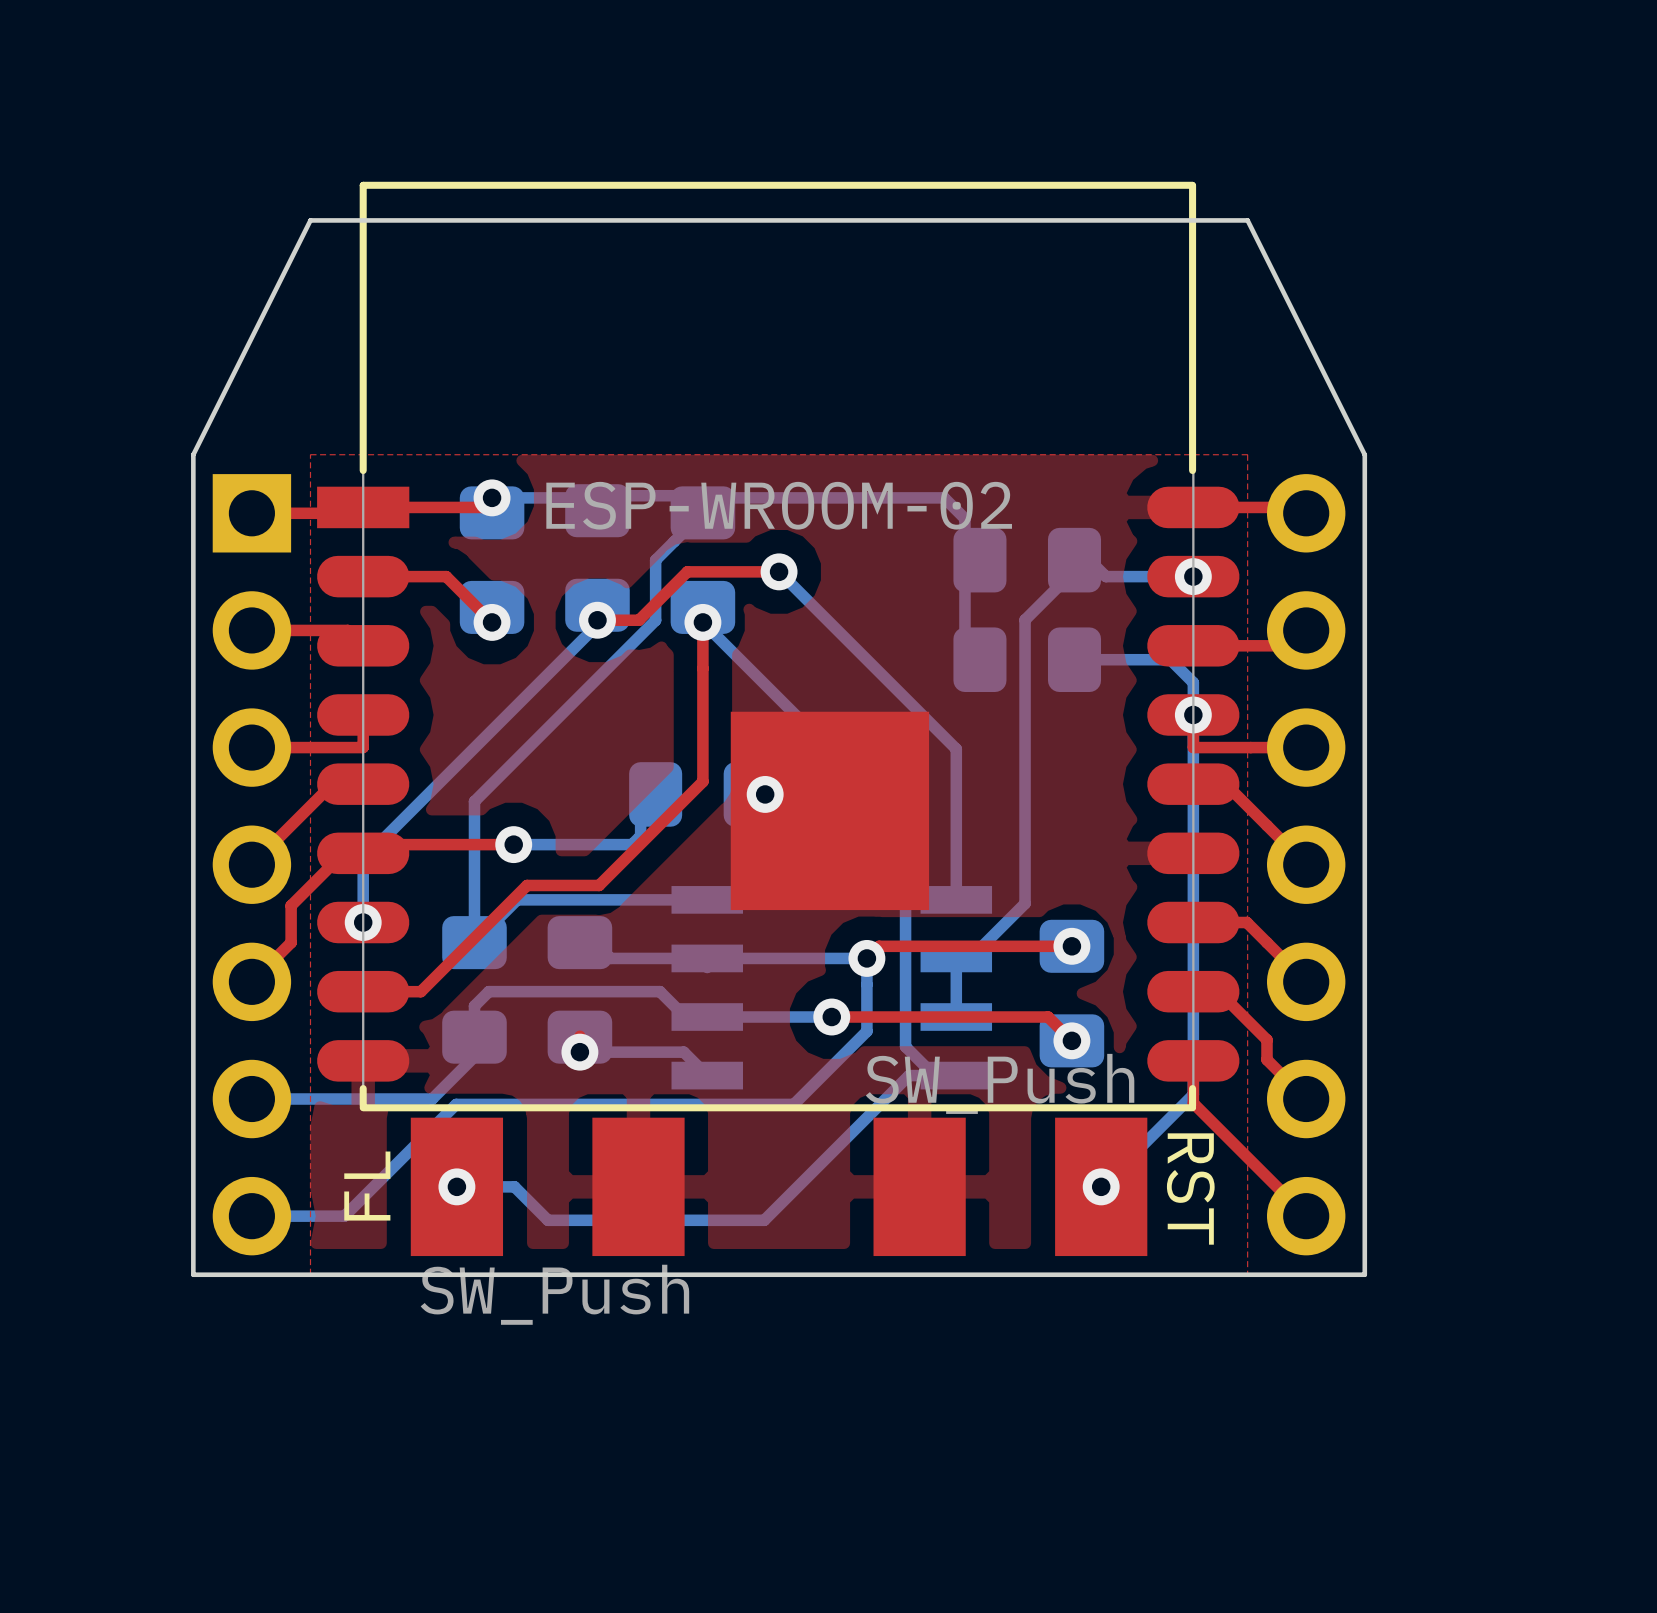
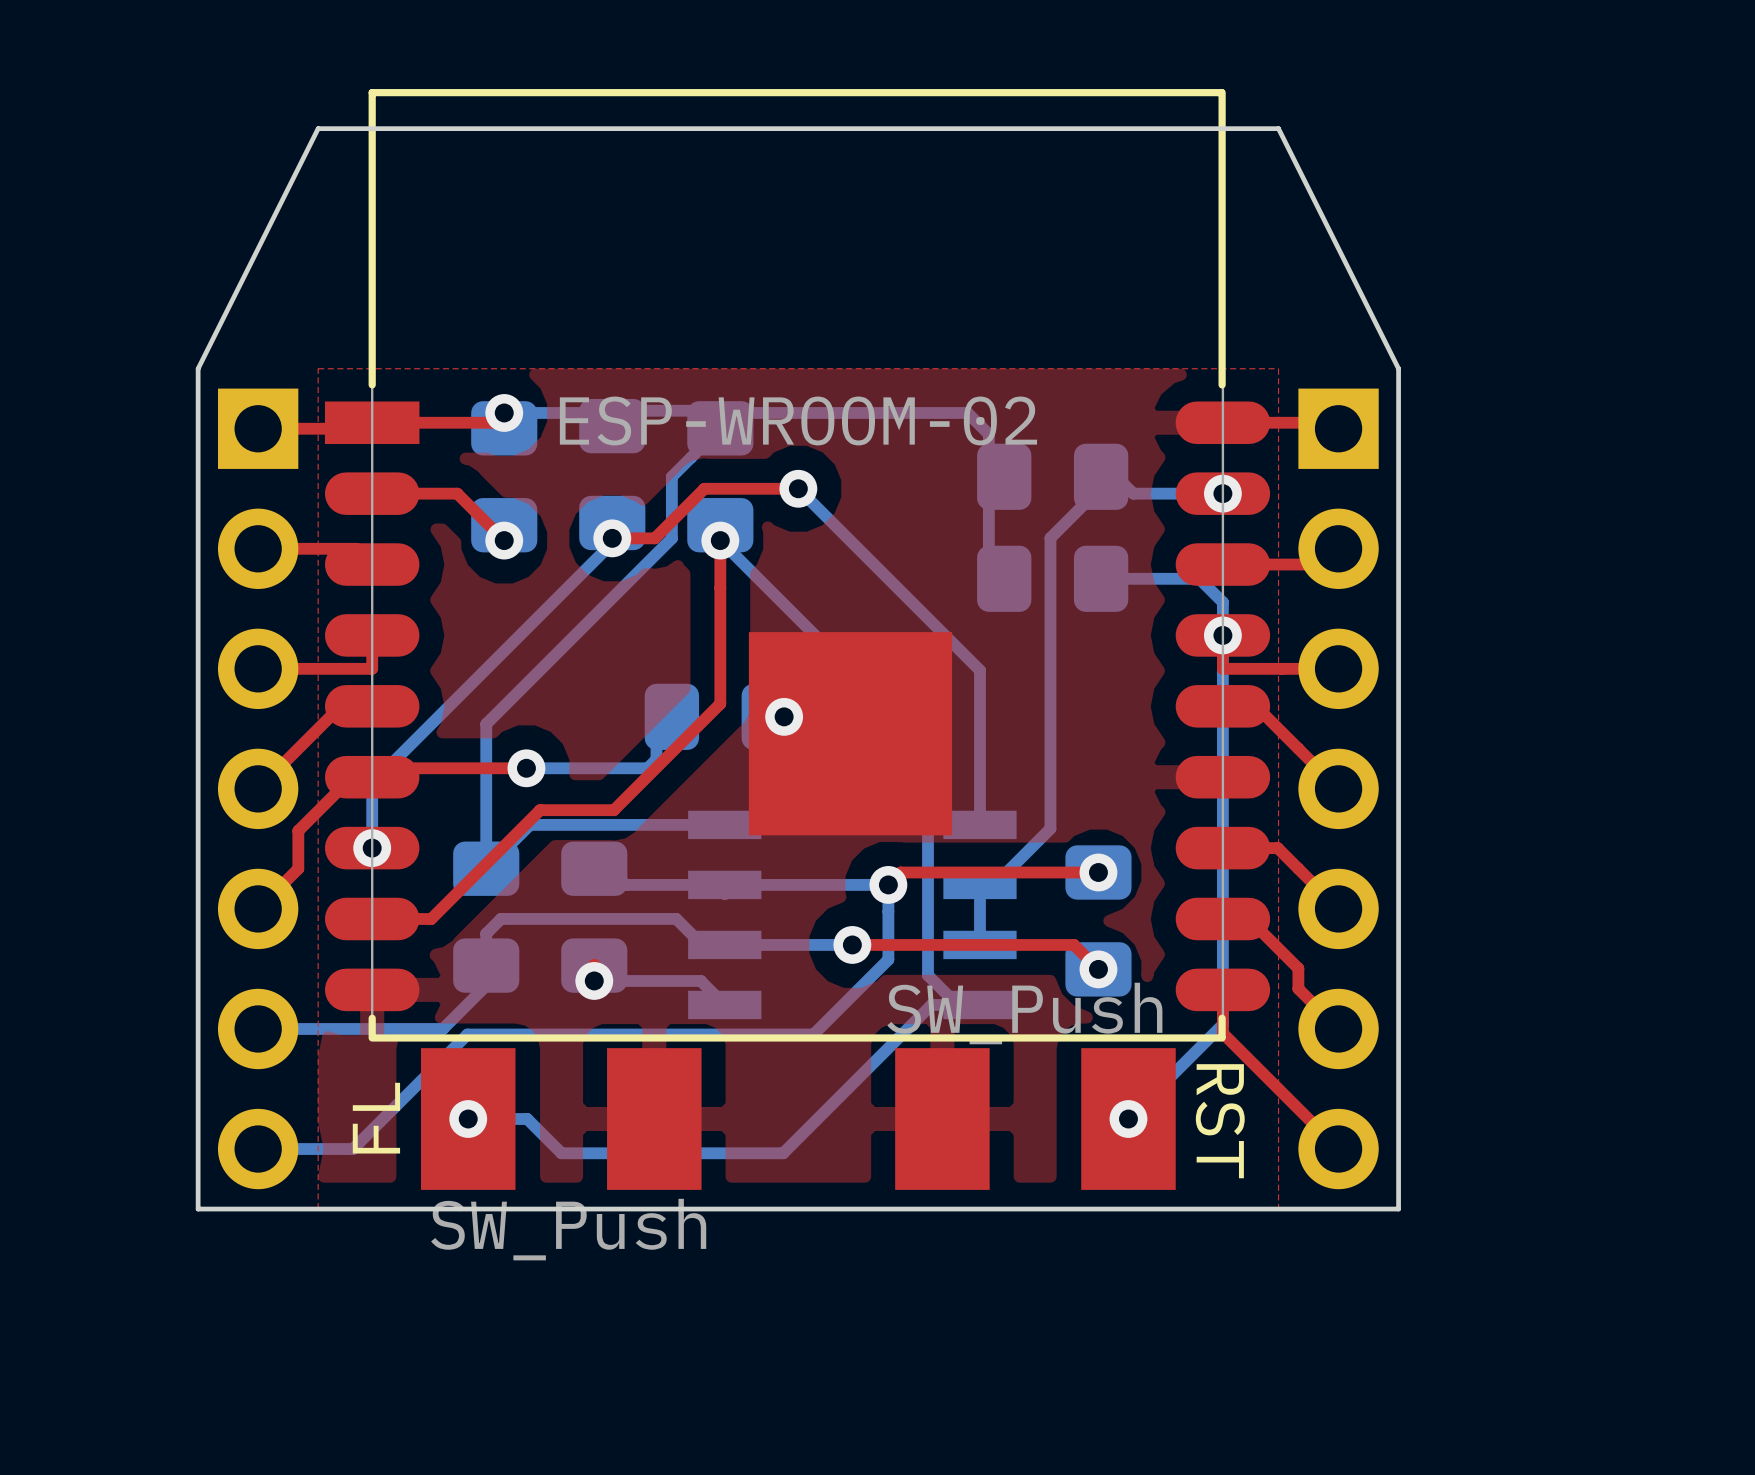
part footprint: [1267, 474, 1346, 1256] -> [1298, 388, 1379, 1190]

